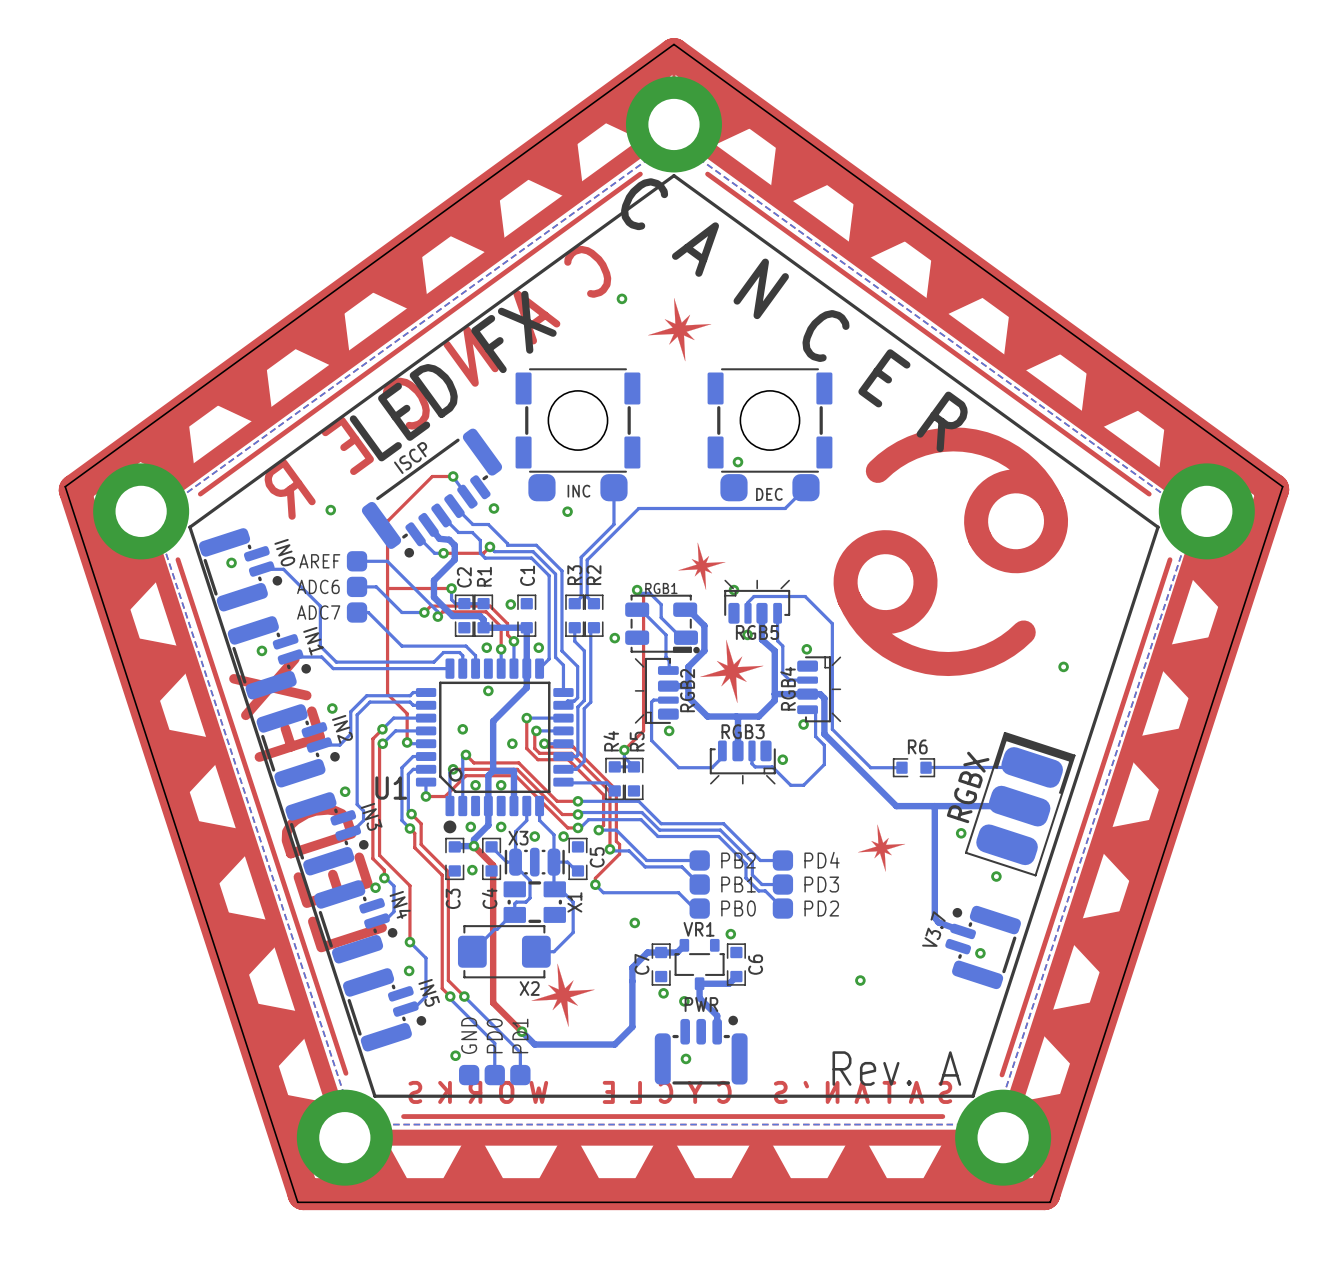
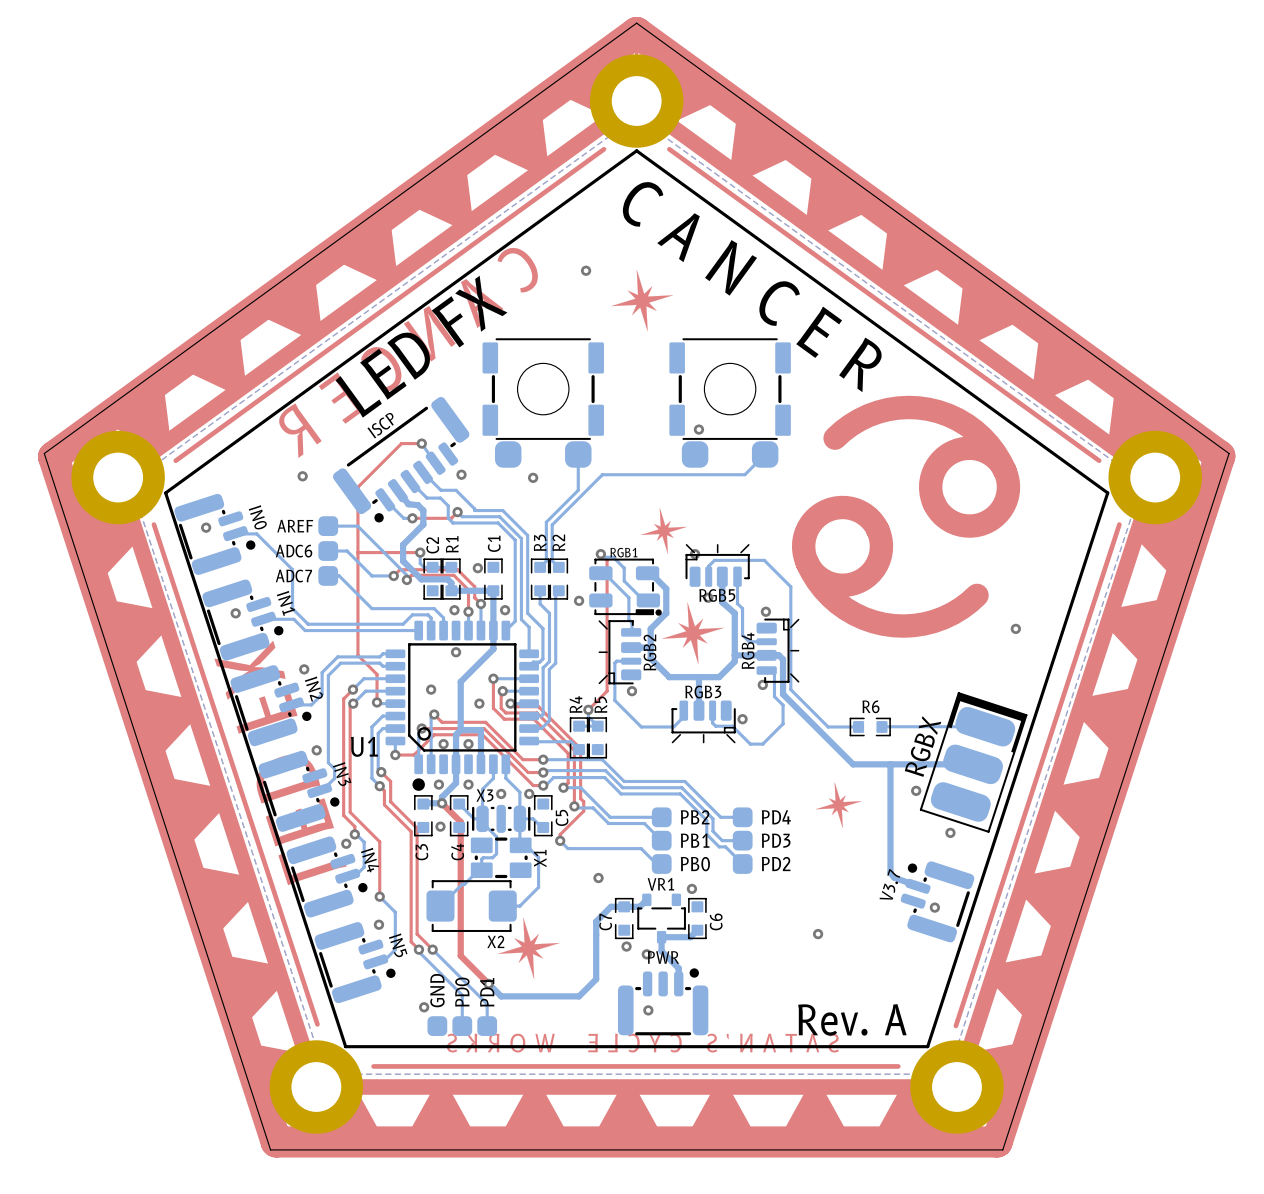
INC: (577, 434) -> none
part: none -> (543, 402)
DEC: (769, 434) -> none
part: none -> (730, 402)

